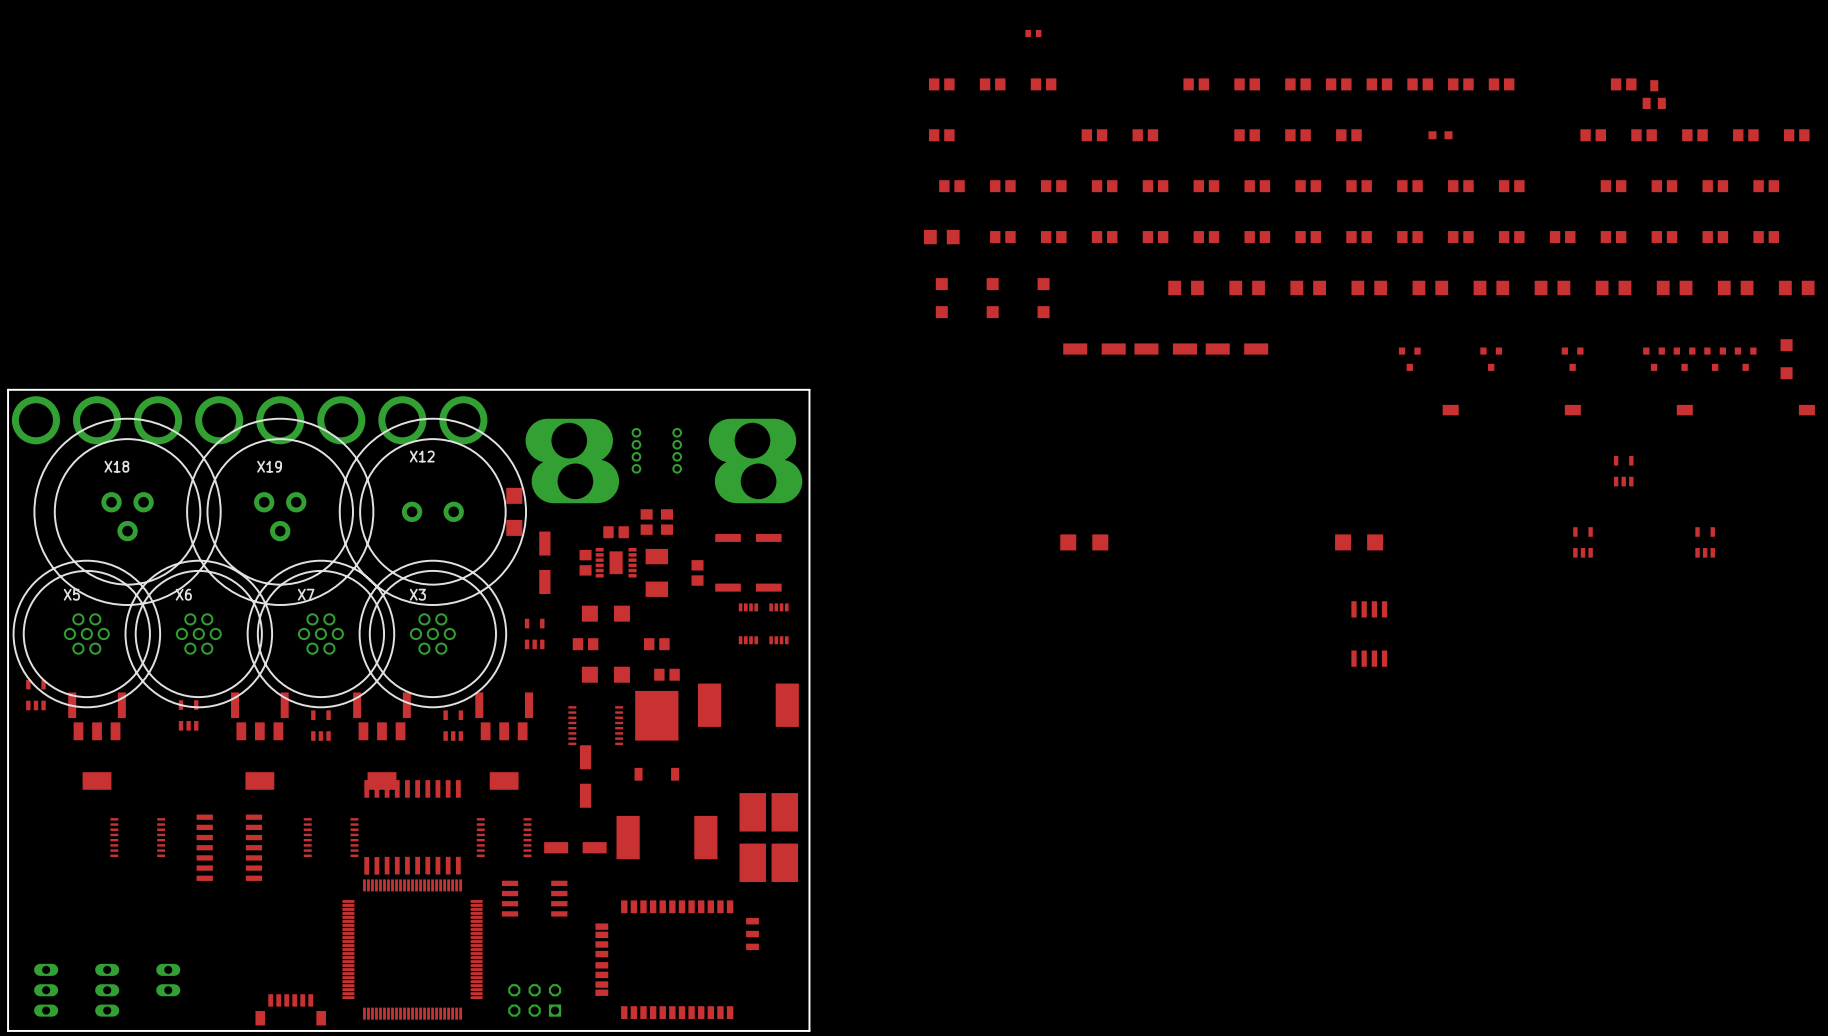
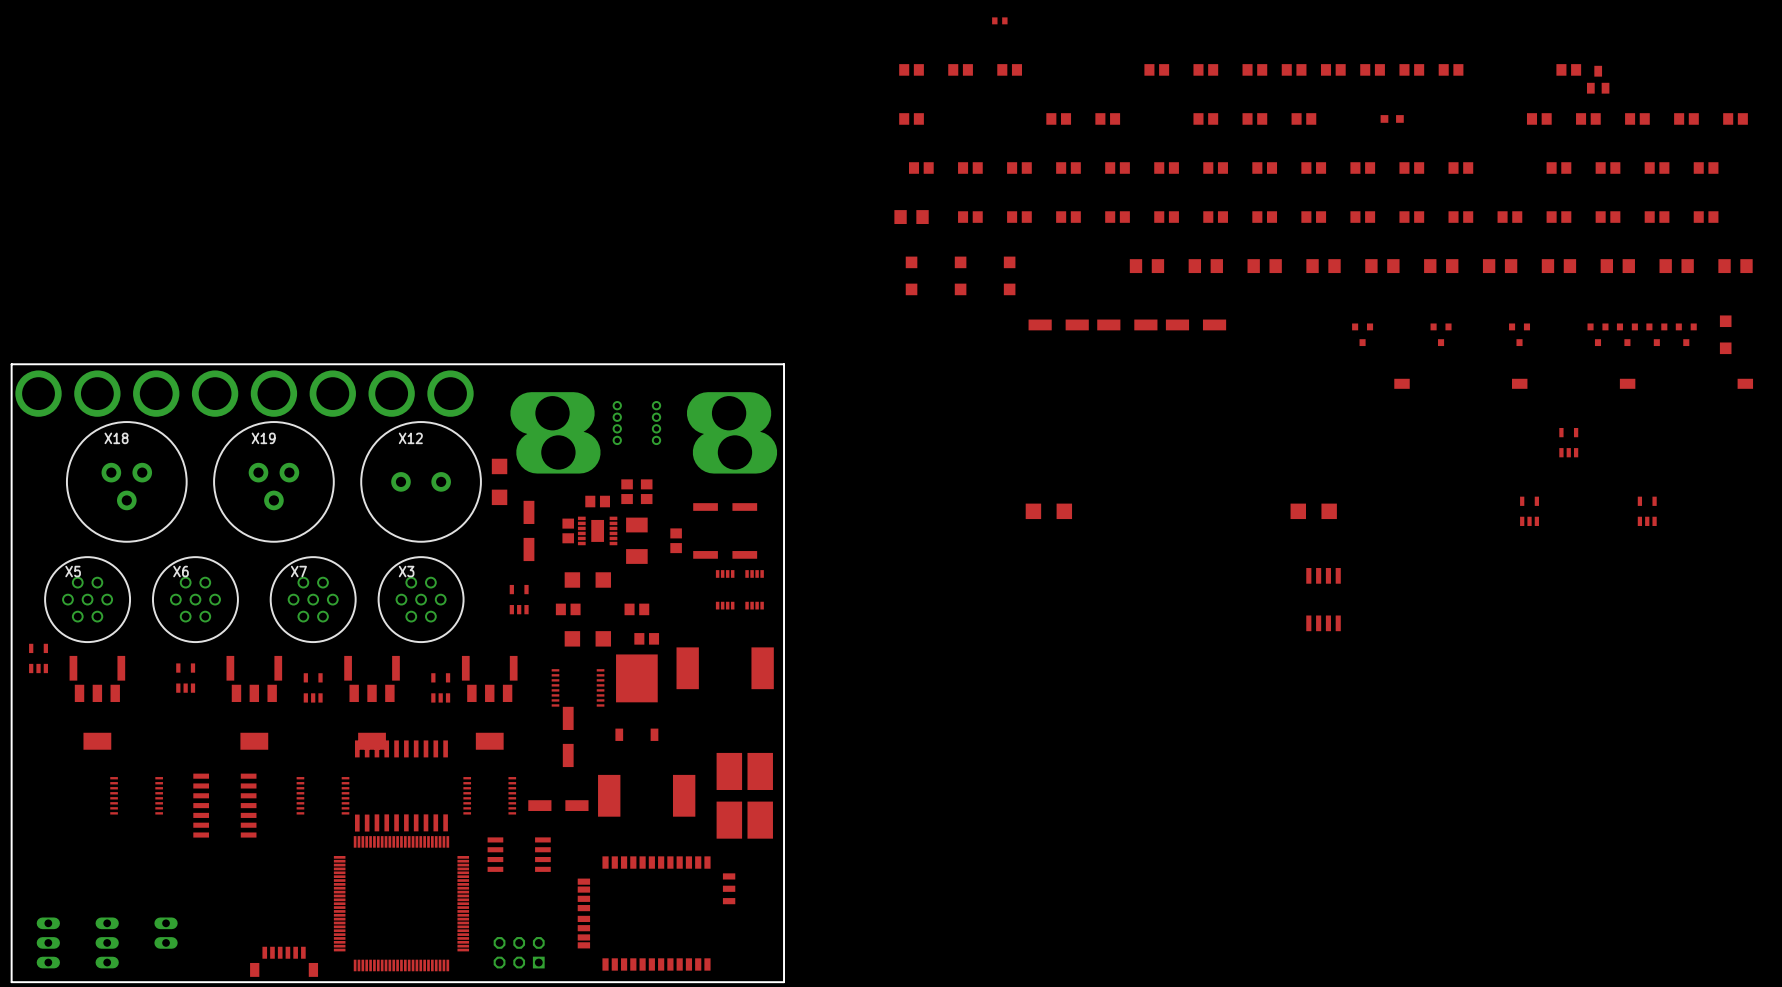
X18 footprint: [33, 418, 222, 606] -> [66, 421, 188, 543]
X19 footprint: [186, 418, 374, 606] -> [213, 421, 335, 543]
X12 footprint: [339, 418, 527, 606] -> [360, 421, 482, 543]
X5 footprint: [13, 560, 161, 708] -> [44, 556, 131, 643]
X6 footprint: [125, 560, 273, 708] -> [152, 556, 239, 643]
X7 footprint: [247, 560, 395, 708] -> [270, 556, 357, 643]
X3 footprint: [359, 560, 507, 708] -> [378, 556, 465, 643]

